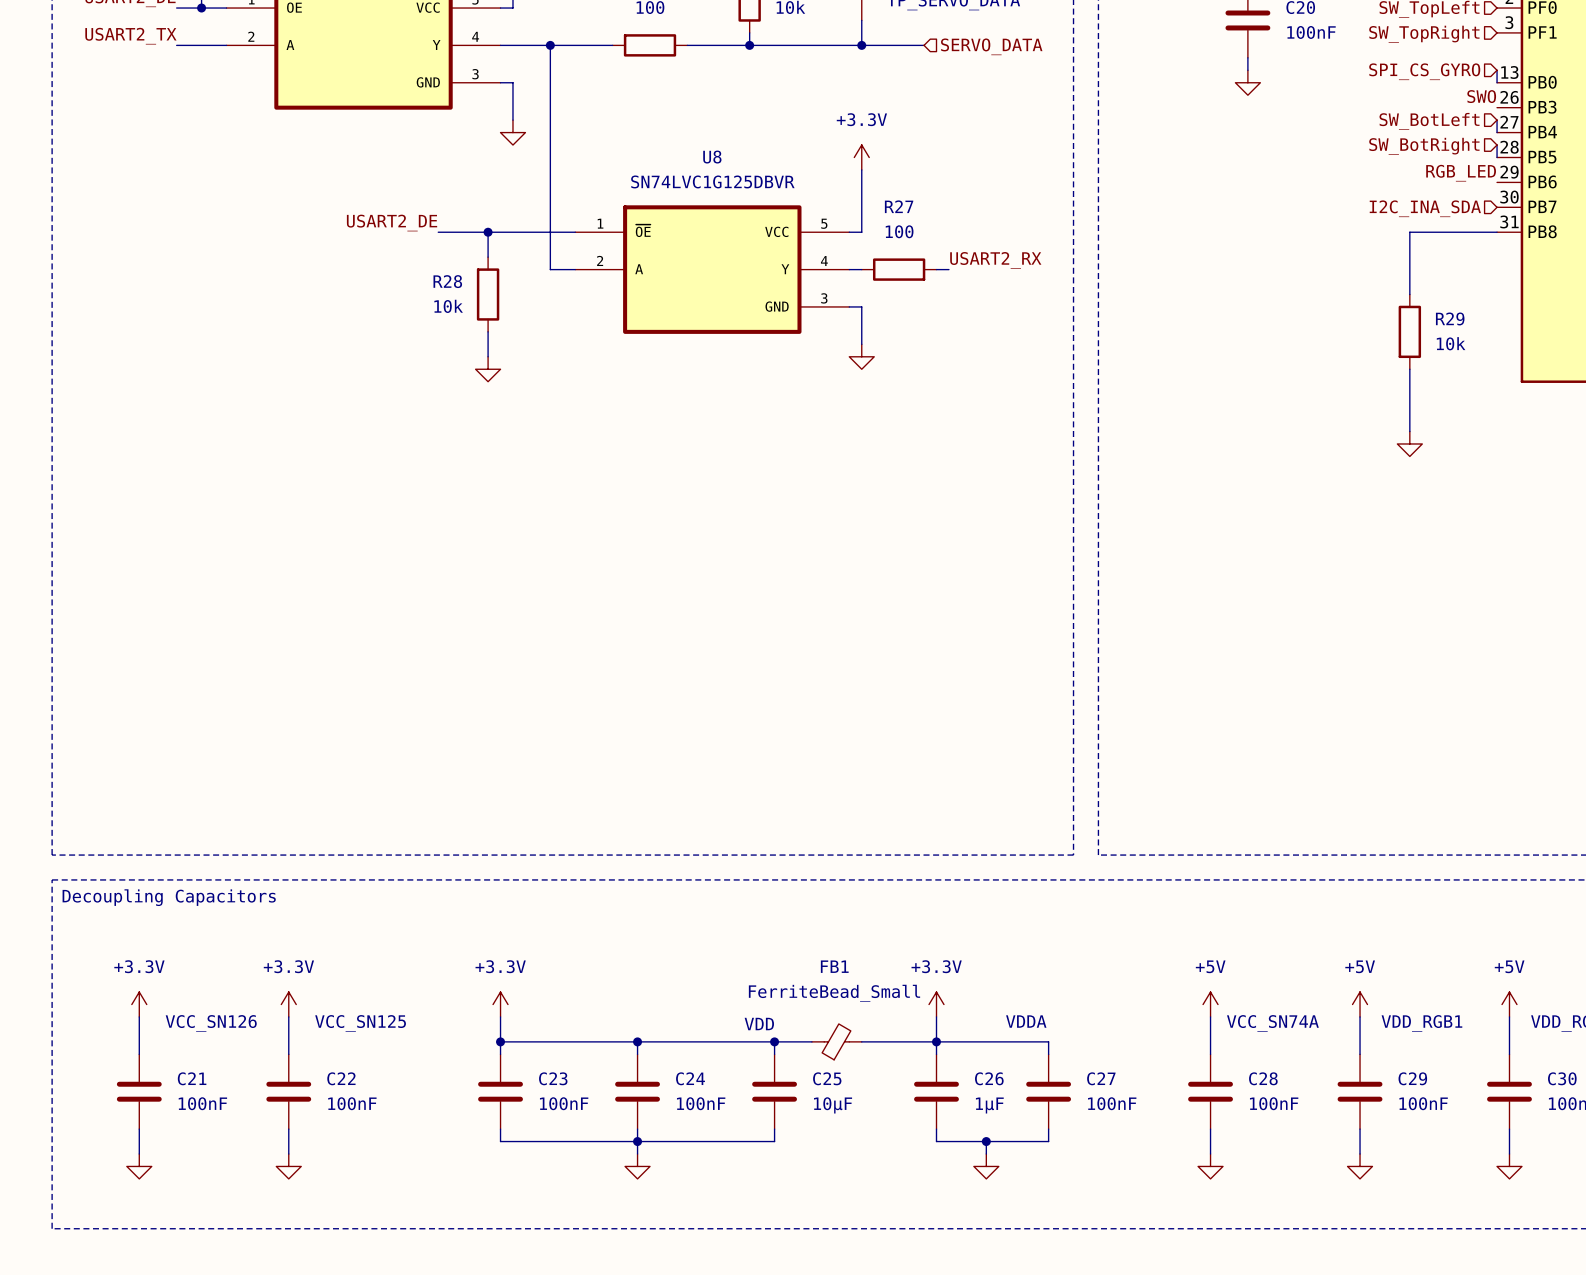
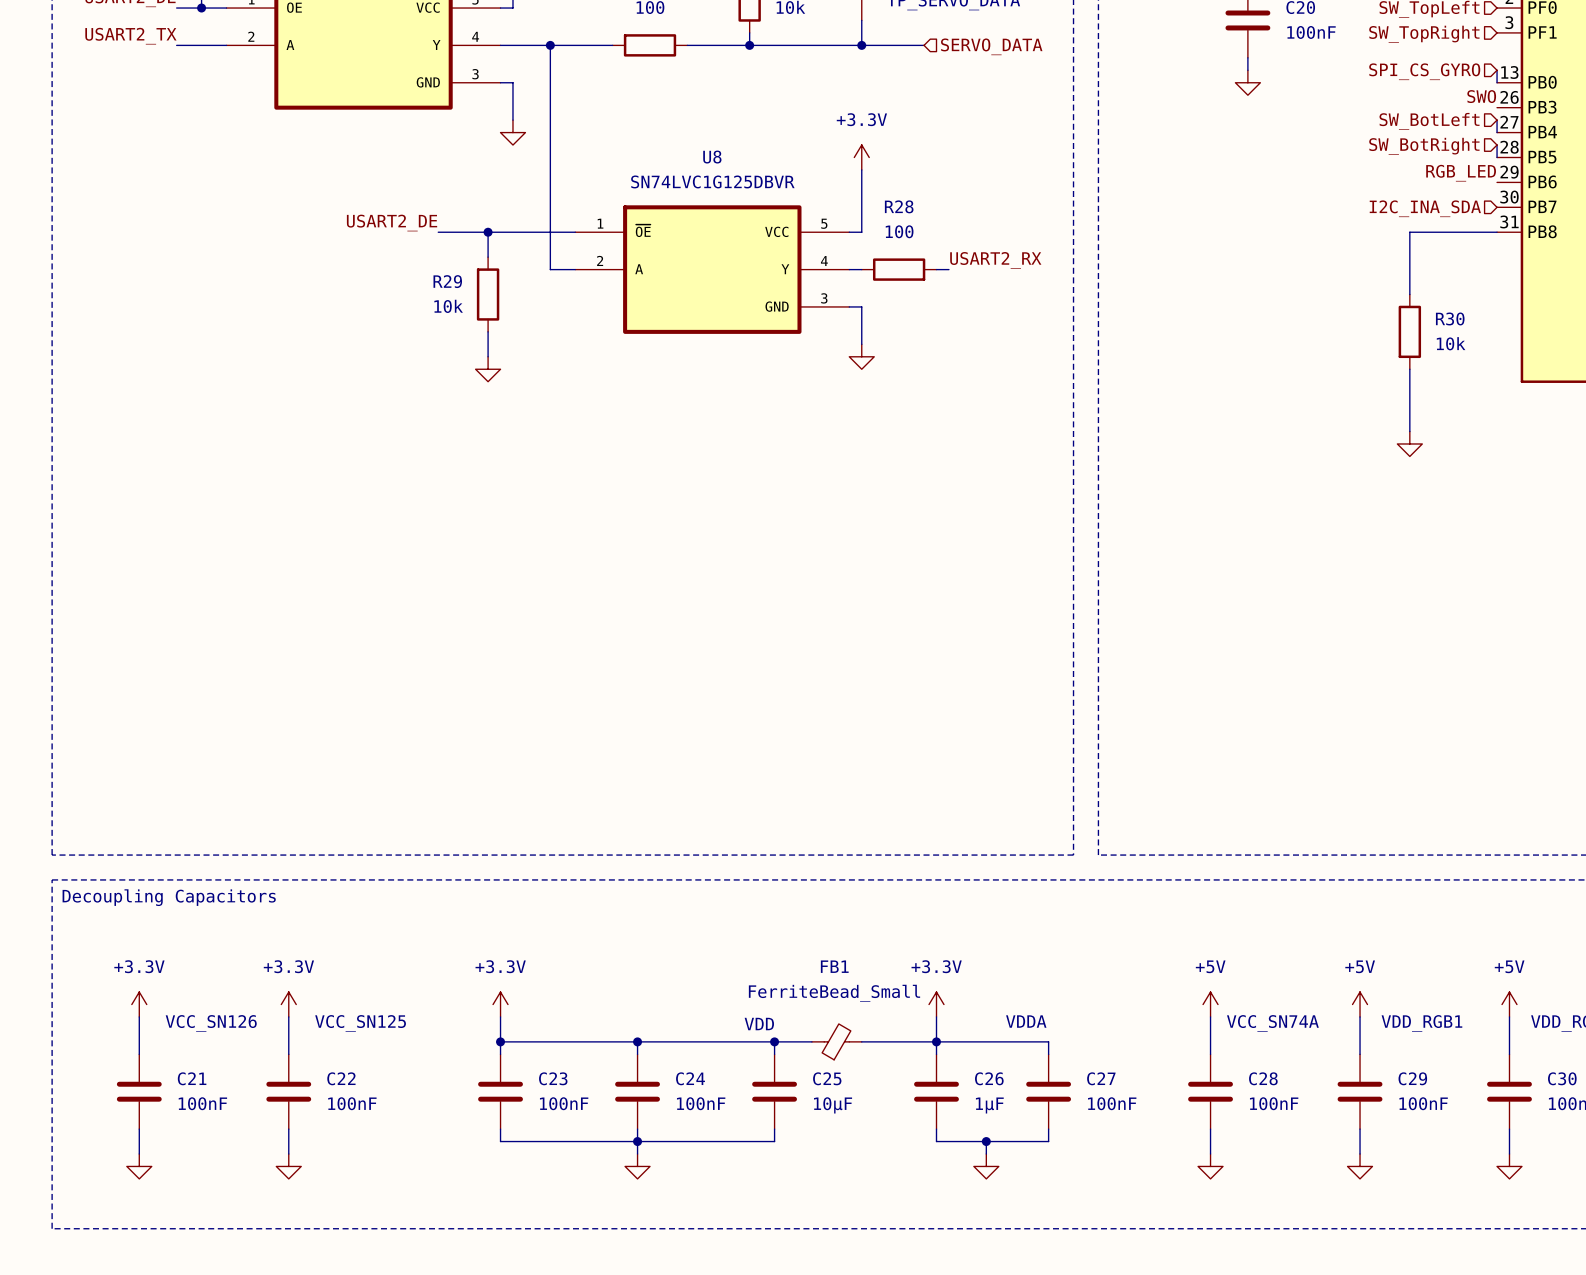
R27 name: R27 (899, 206) -> R28 (899, 206)
R28 name: R28 (447, 281) -> R29 (447, 281)
R29 name: R29 (1450, 318) -> R30 (1450, 318)

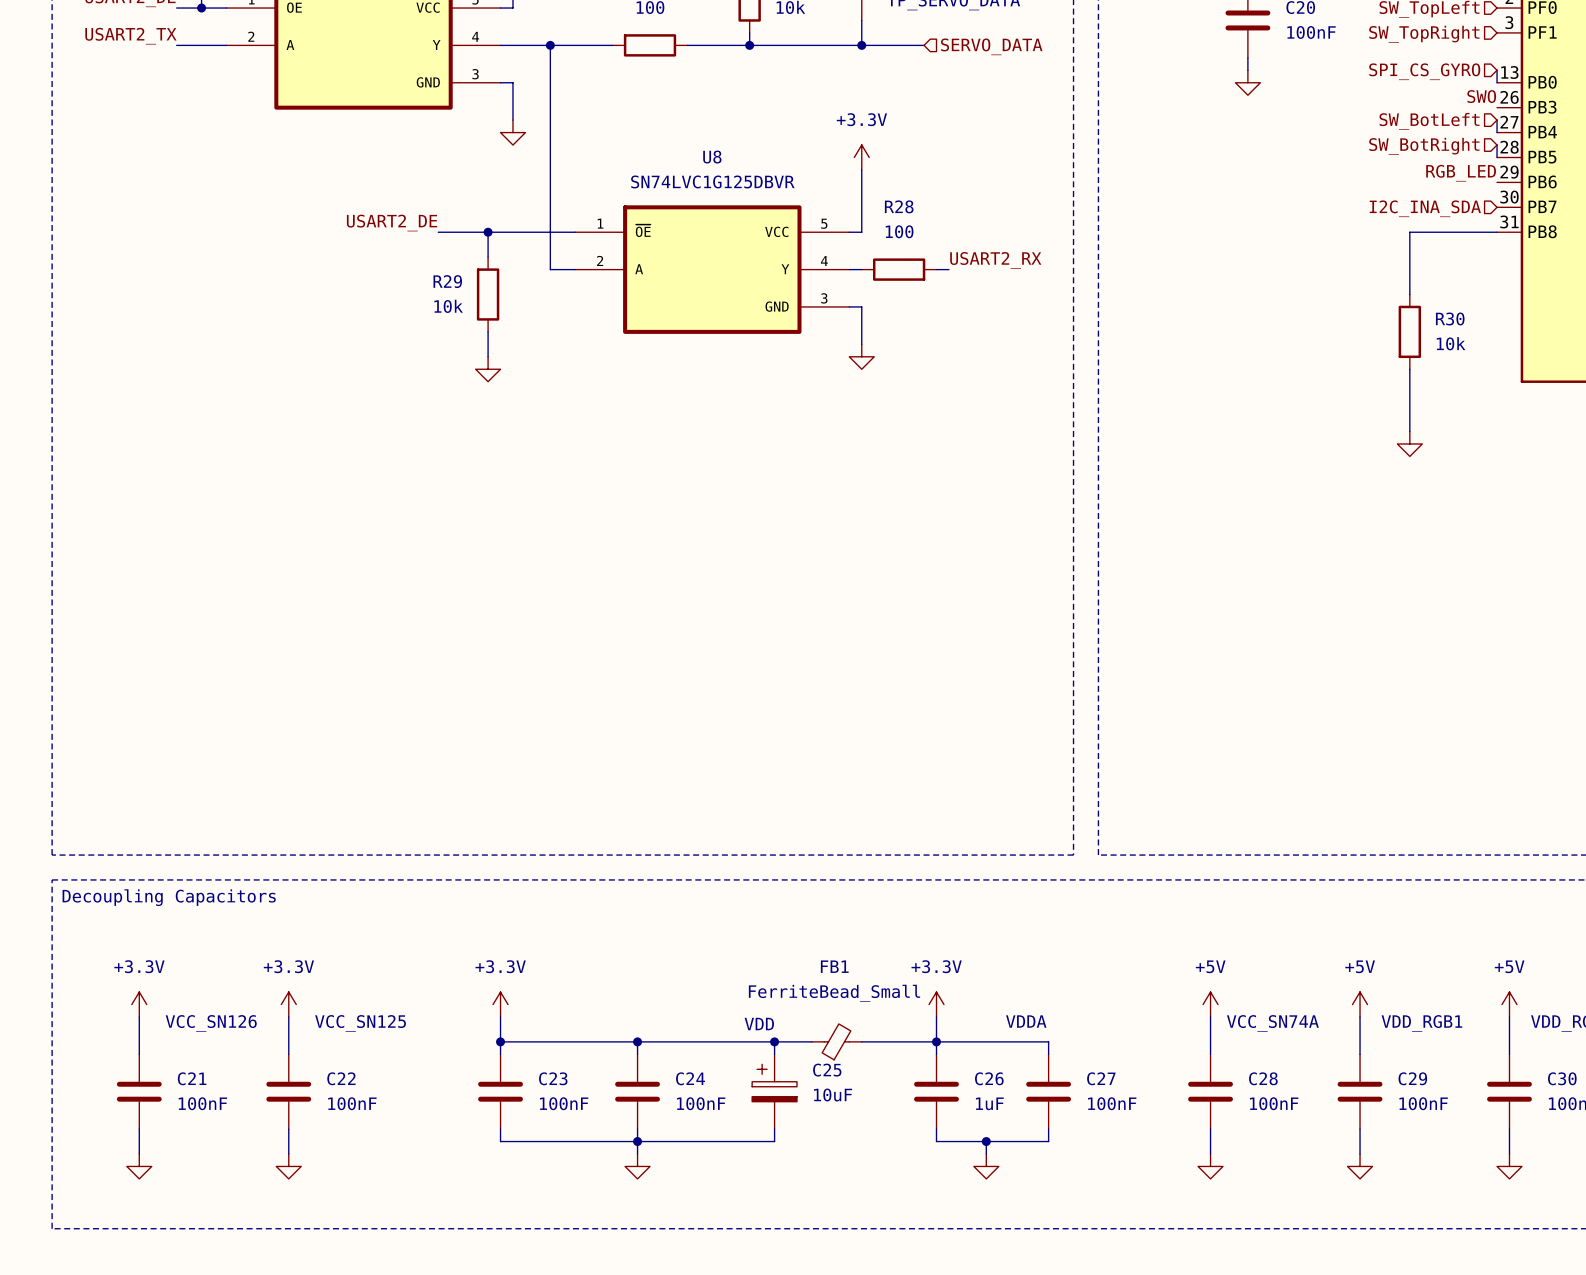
C25 symbol: [752, 1054, 797, 1130] -> [752, 1054, 797, 1130]
C25 value: 10µF (833, 1105) -> 10uF (833, 1095)
C26 value: 1µF (989, 1105) -> 1uF (989, 1103)

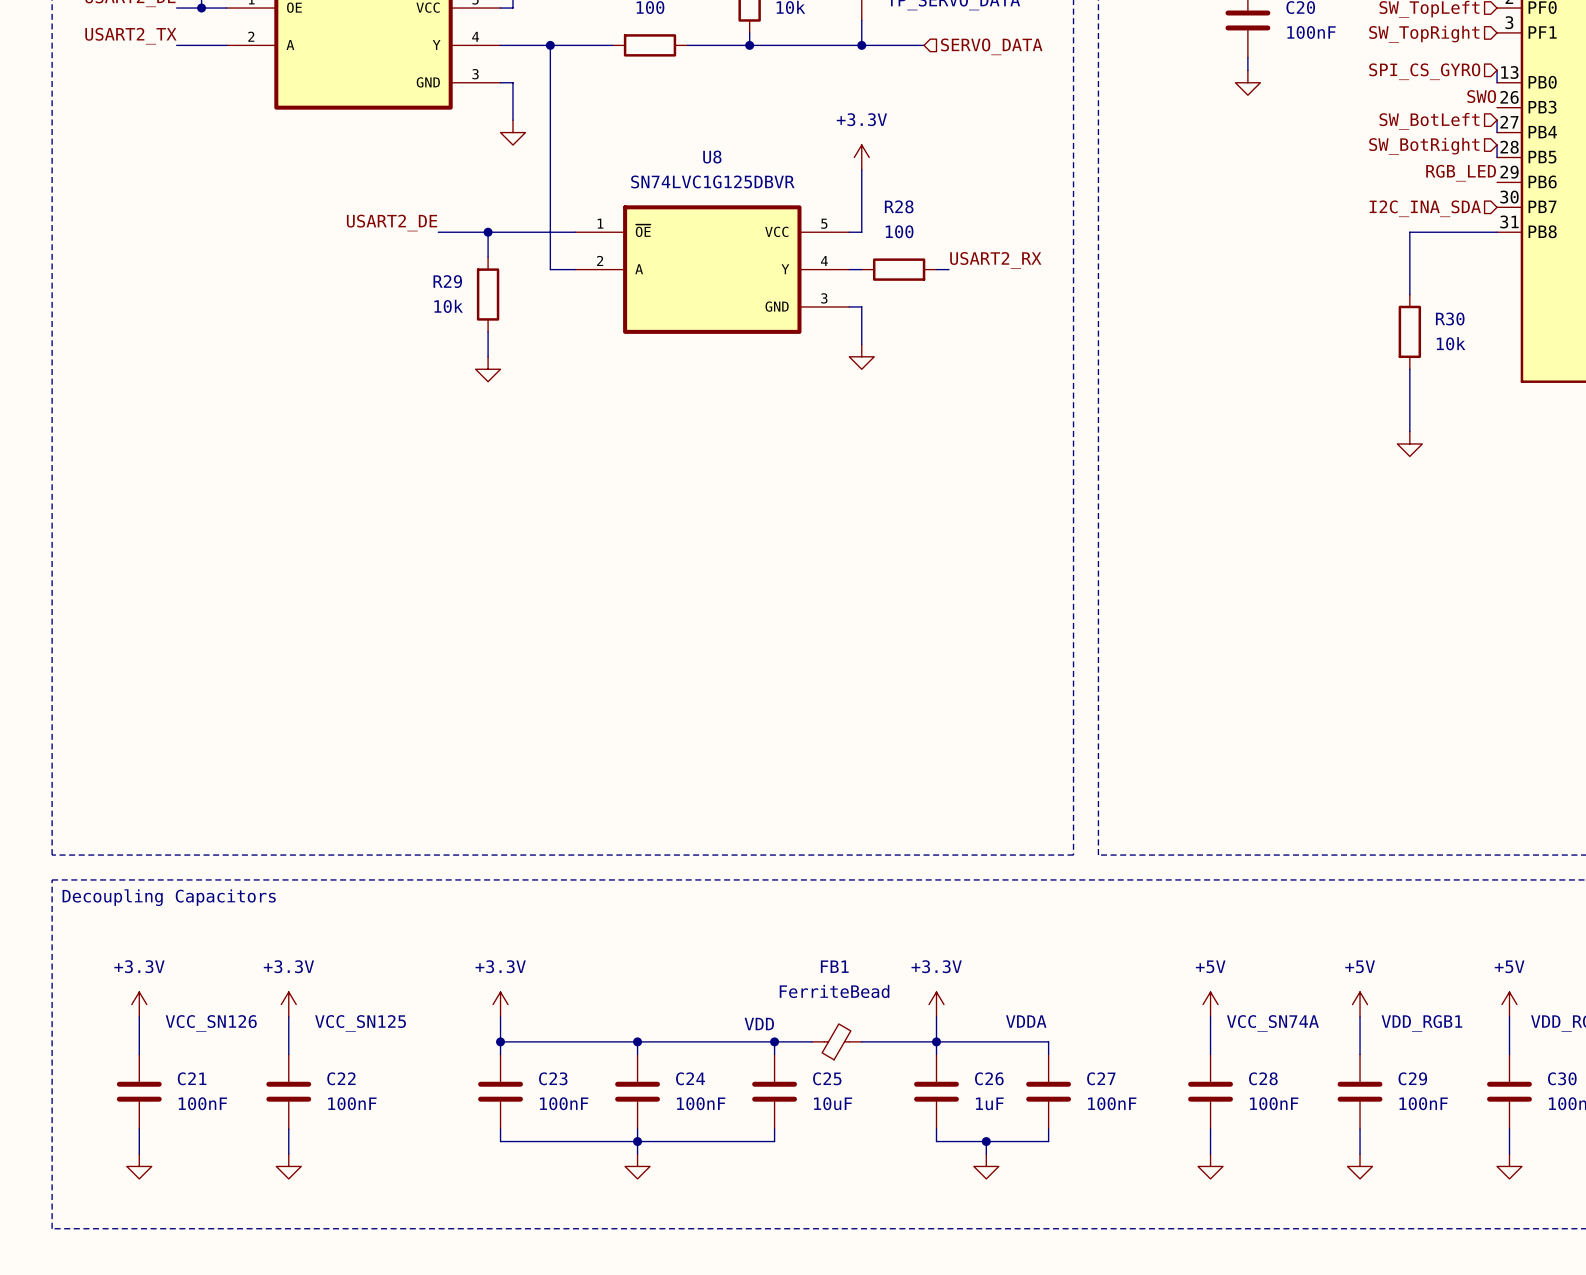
FB1 value: FerriteBead_Small (834, 993) -> FerriteBead (834, 991)
C25 symbol: [752, 1054, 797, 1130] -> [752, 1054, 797, 1130]

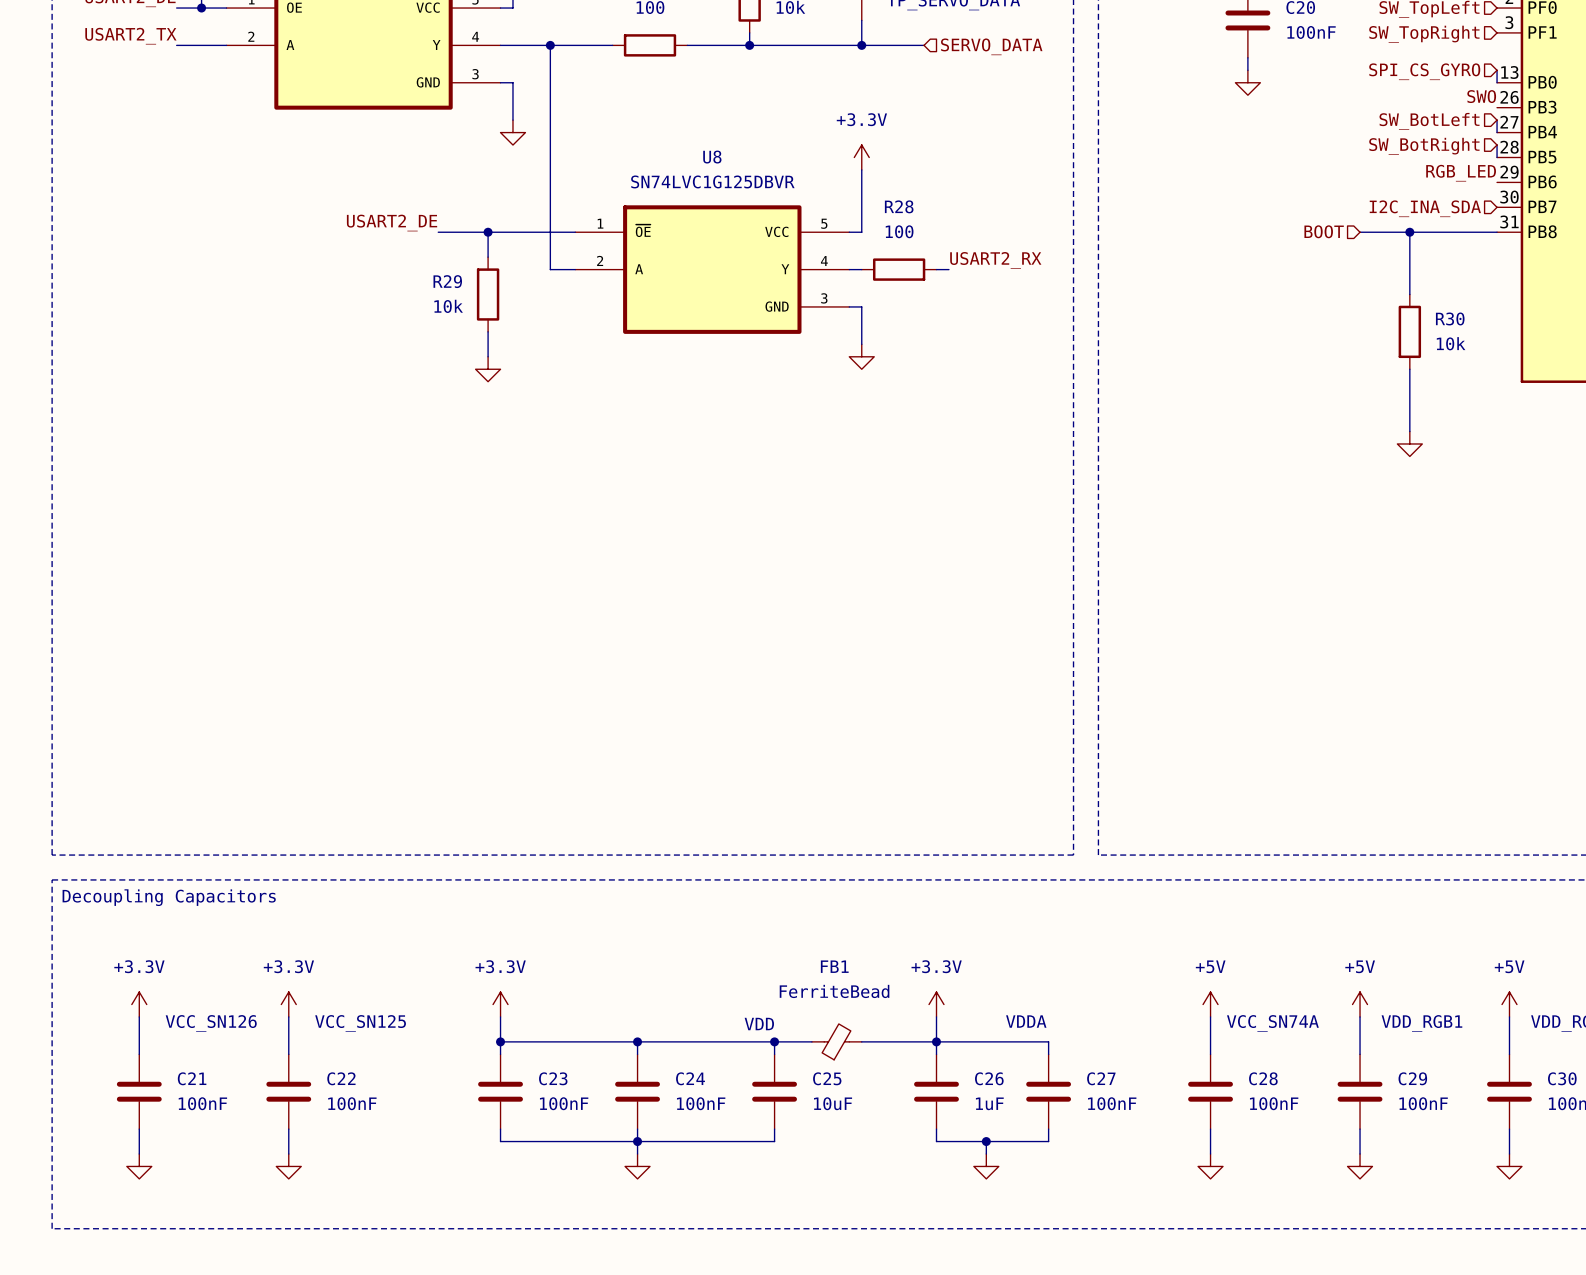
hierarchical label: none -> BOOT (1324, 231)
wire: none -> (1360, 232) (1409, 232)
junction: none -> (1409, 232)

